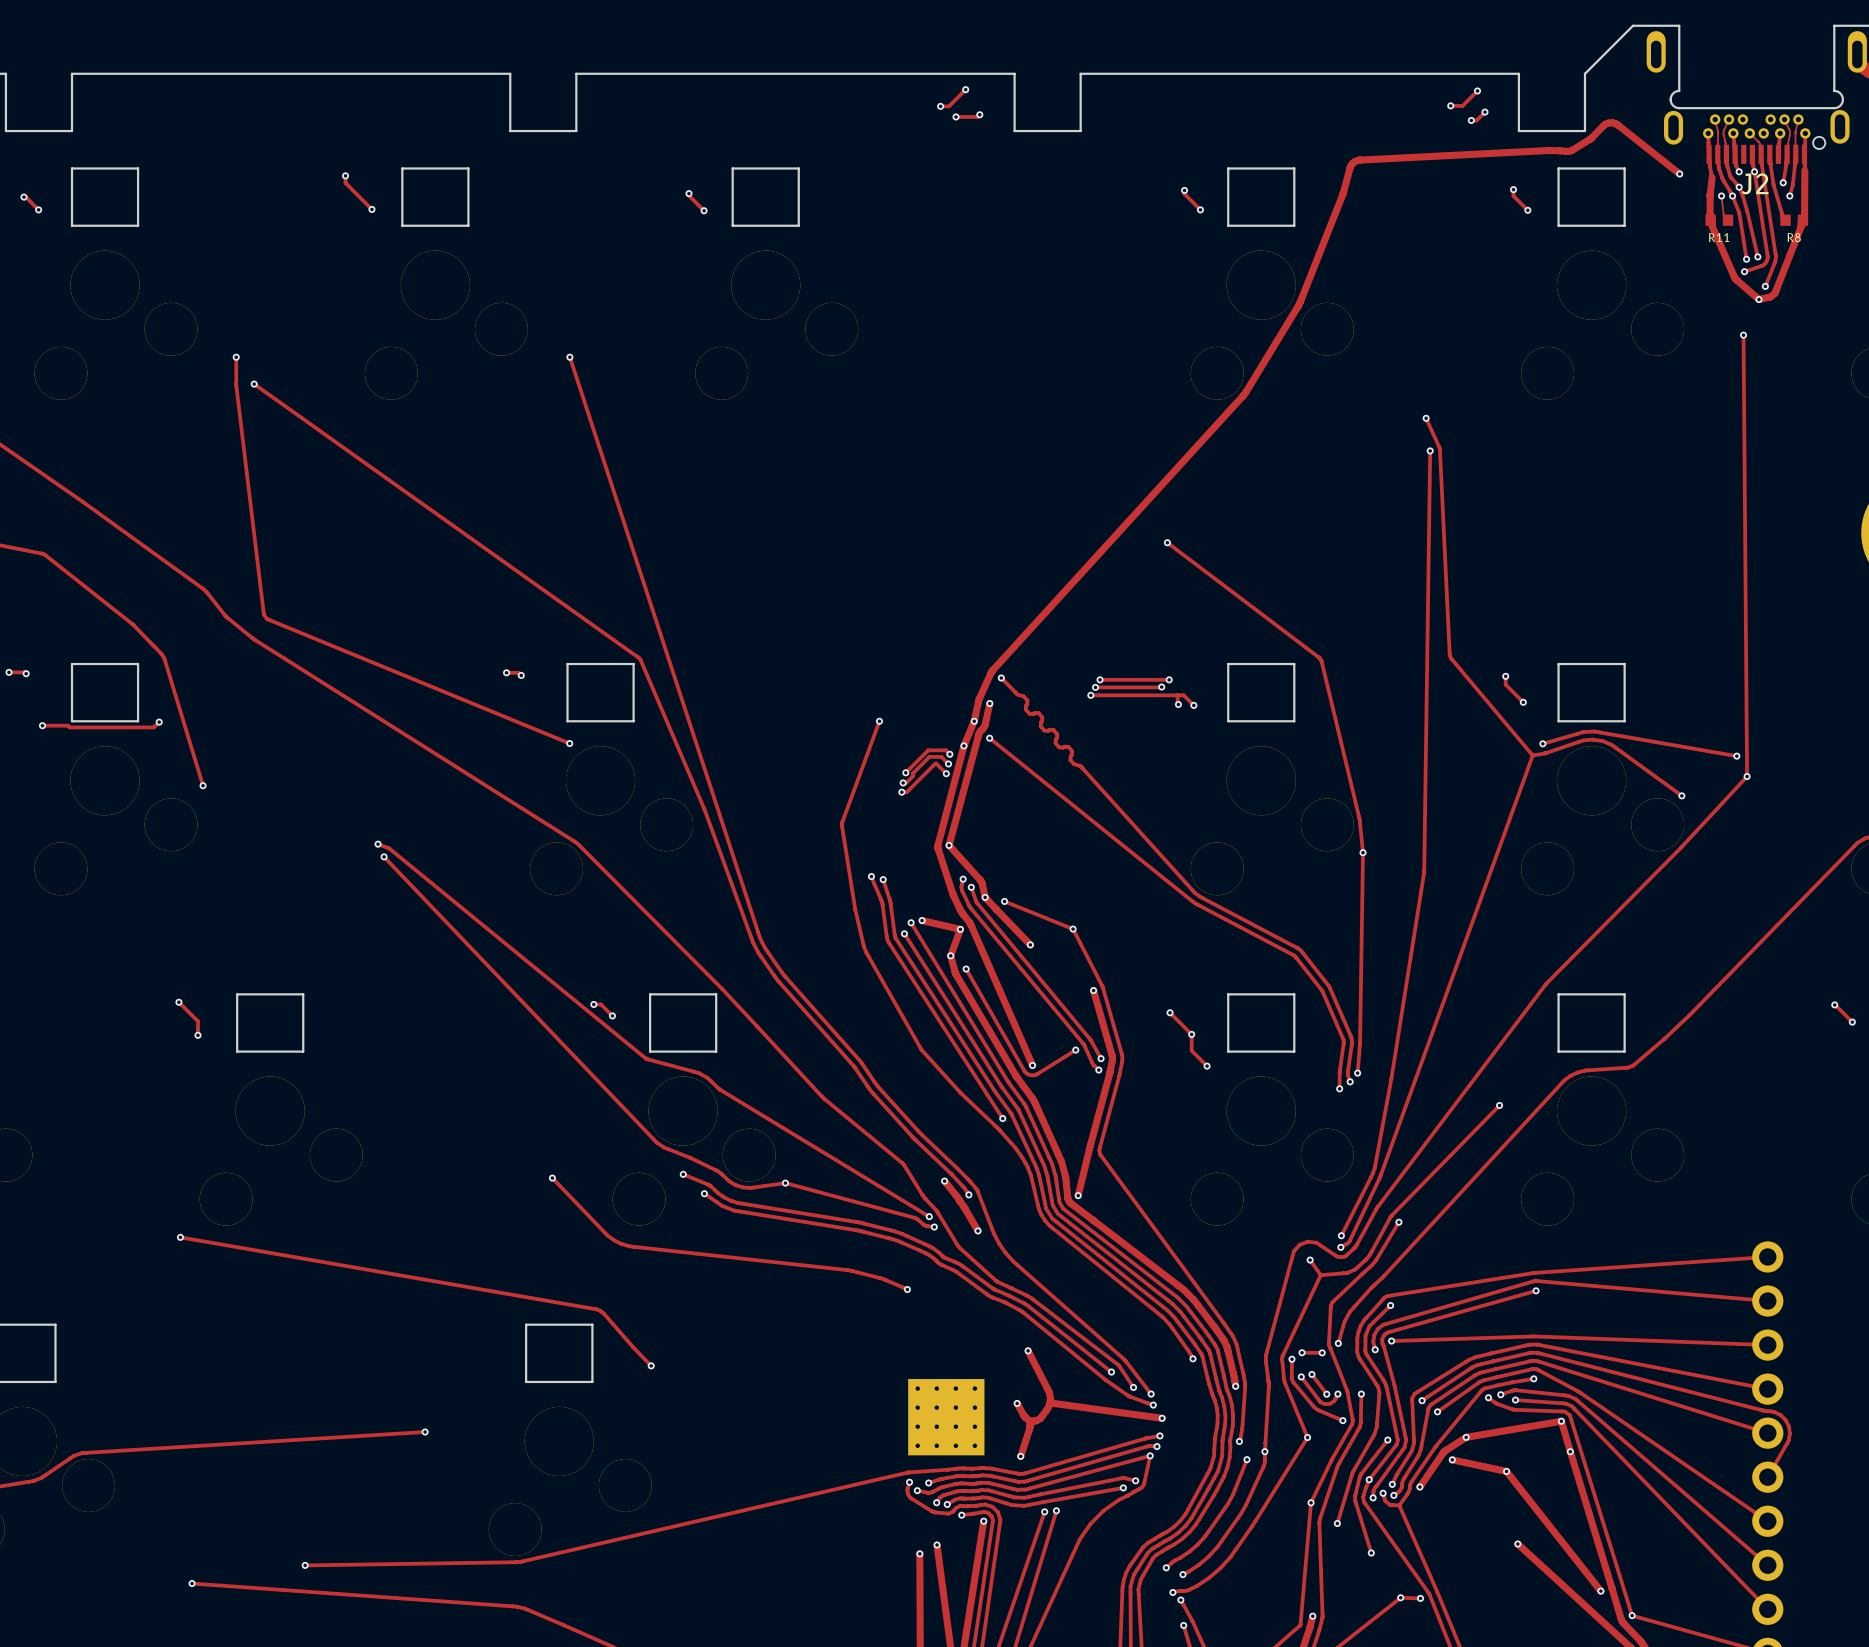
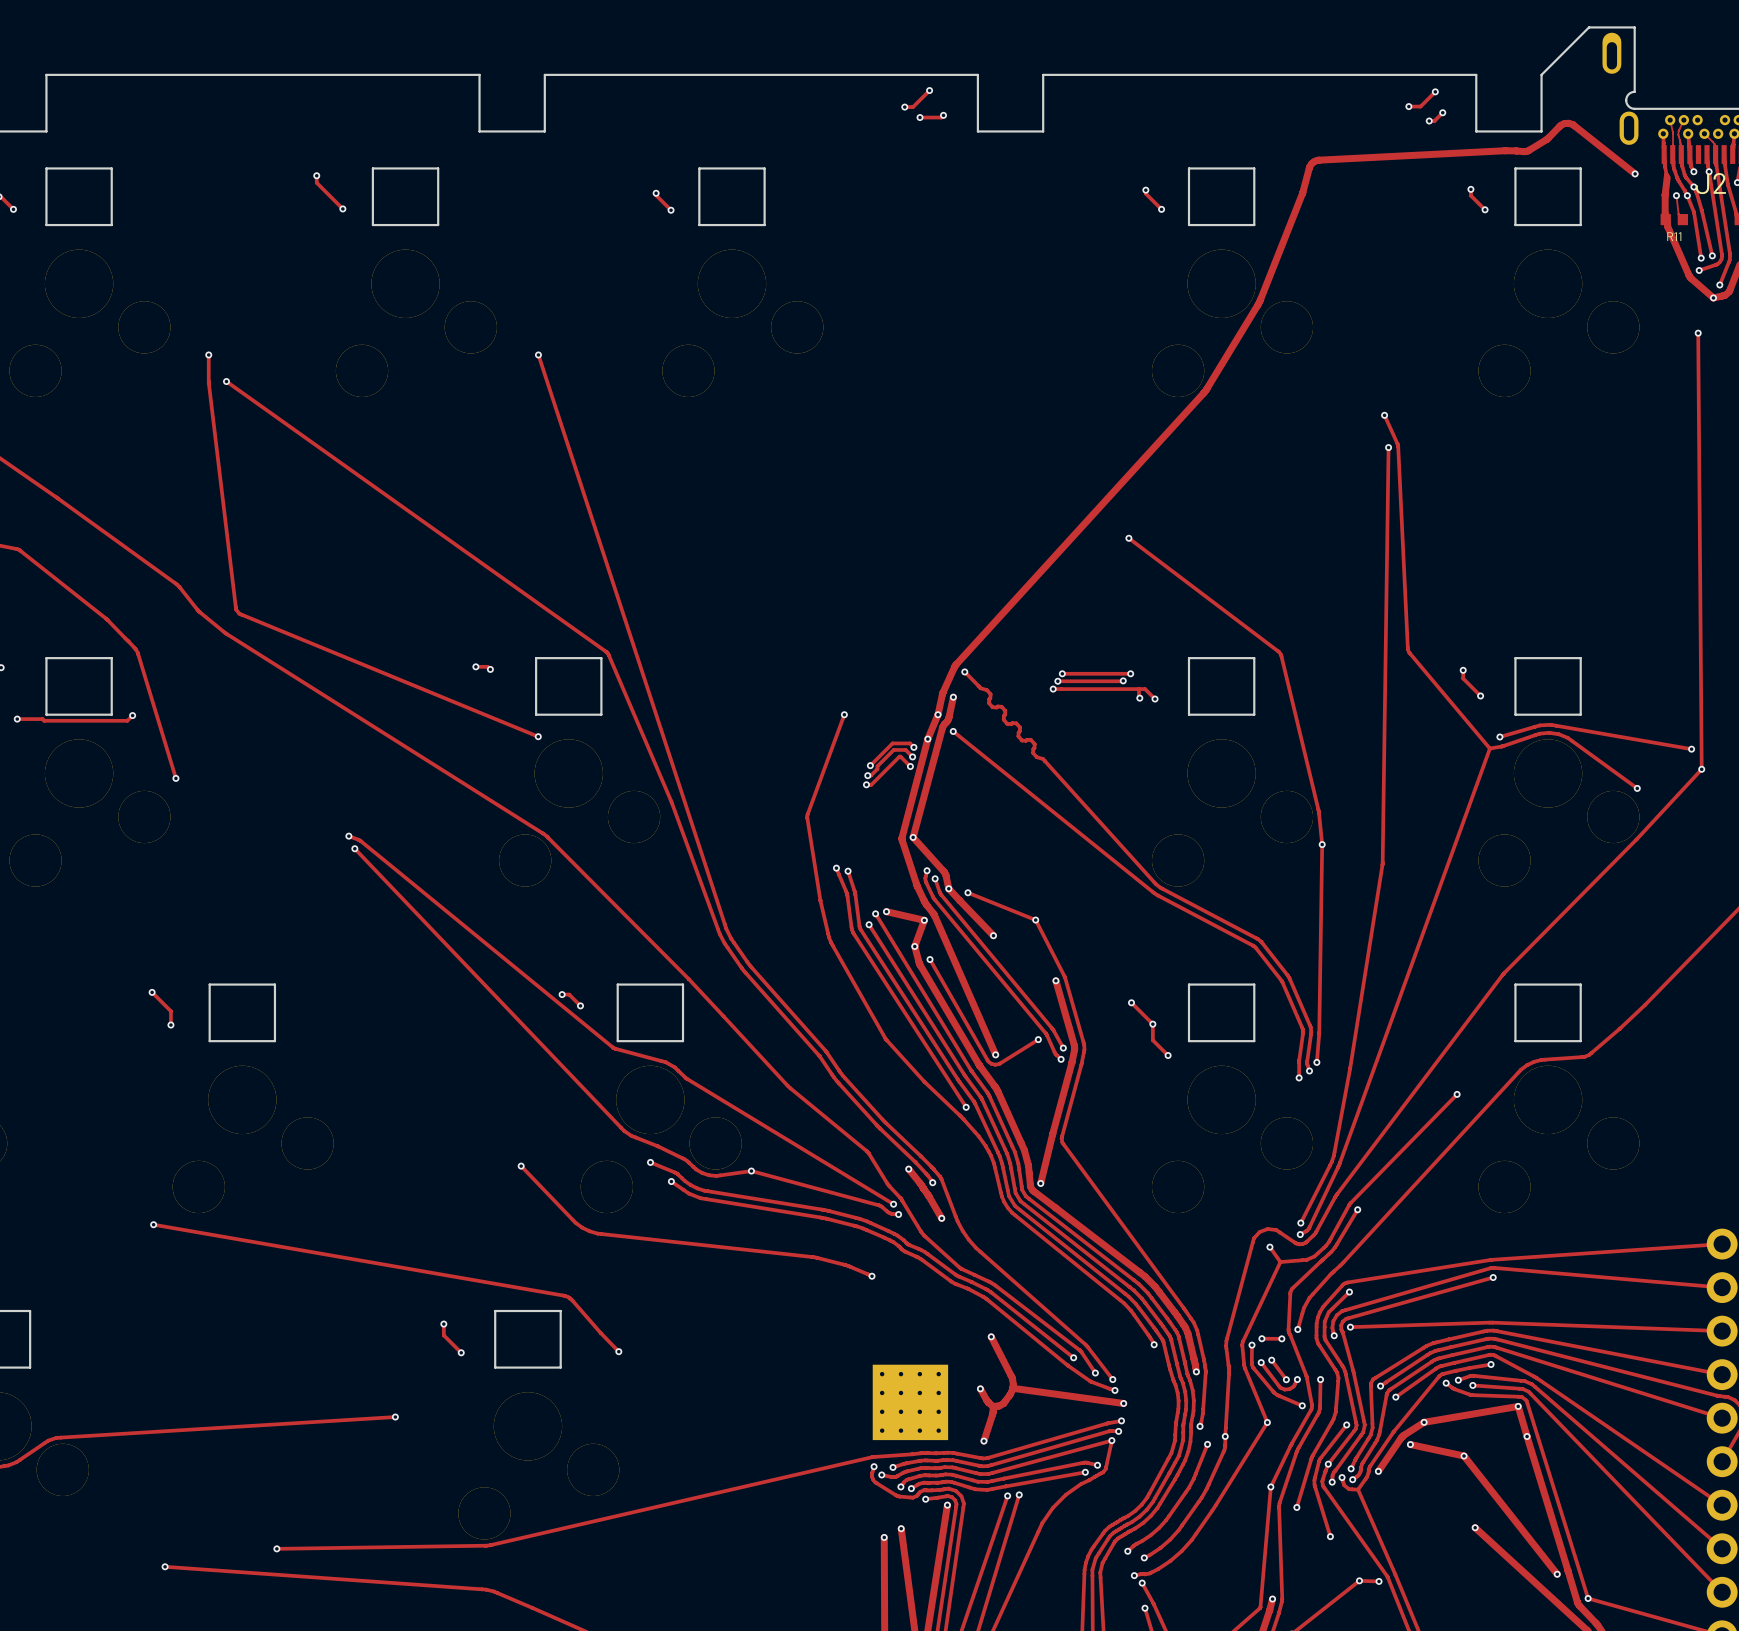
track: none -> (443, 1324) (443, 1335) (461, 1352)
via: none -> (443, 1324)
via: none -> (461, 1352)

